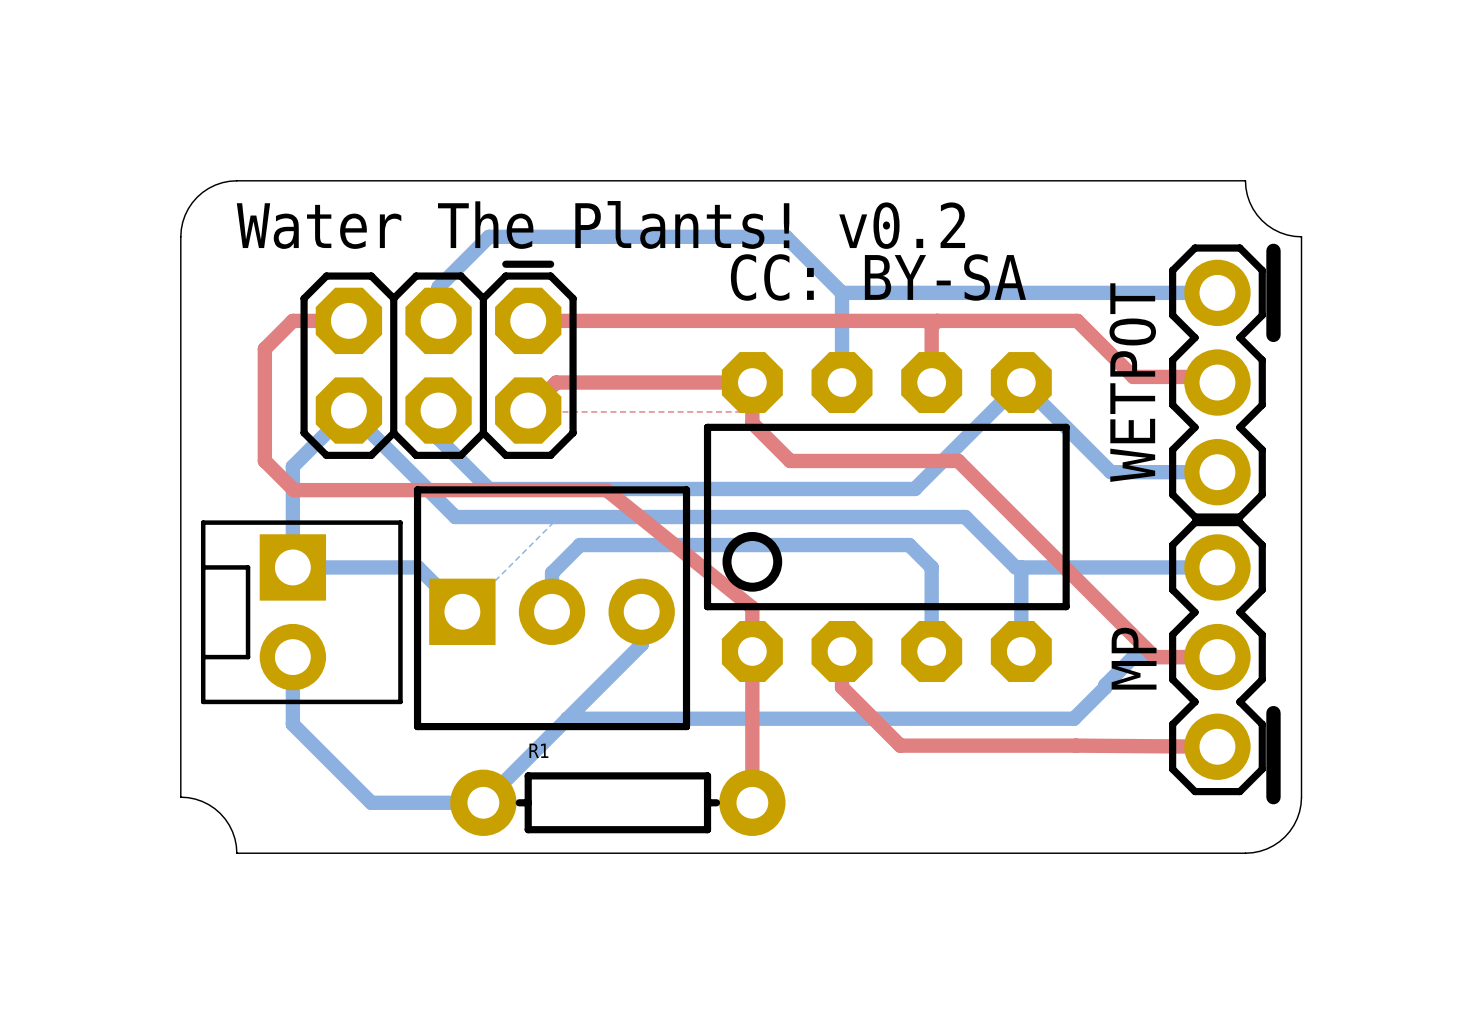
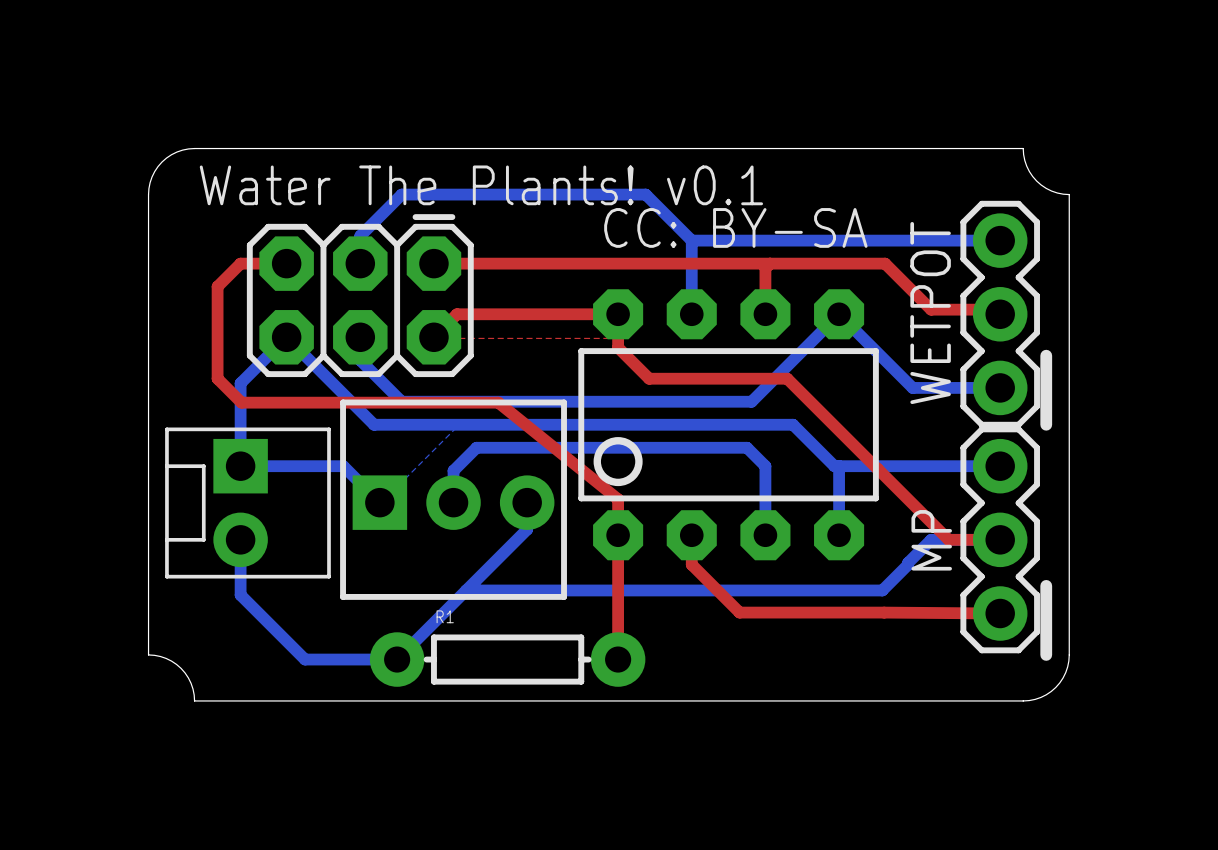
text: Water The Plants! v0.2 (600, 224) -> Water The Plants! v0.1 (481, 185)
line: (1273, 250) (1273, 334) -> (1046, 355) (1046, 424)

